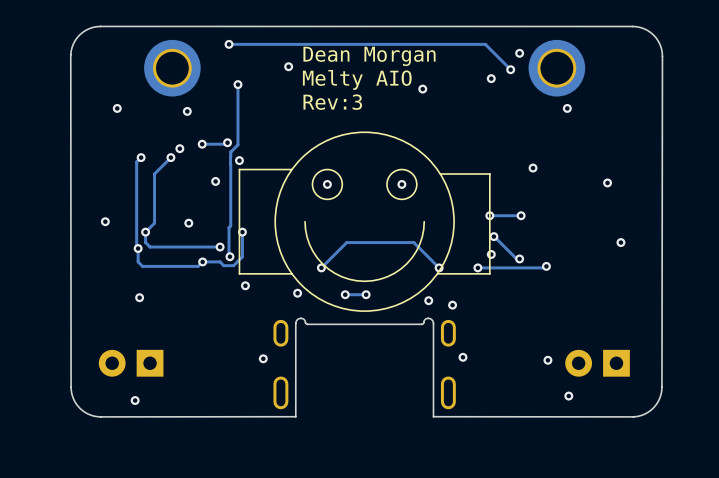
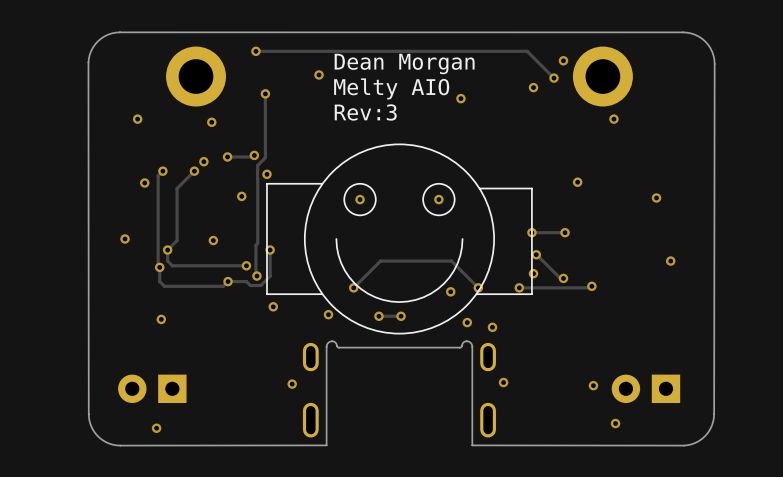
via: none -> (144, 182)
via: none -> (450, 291)

